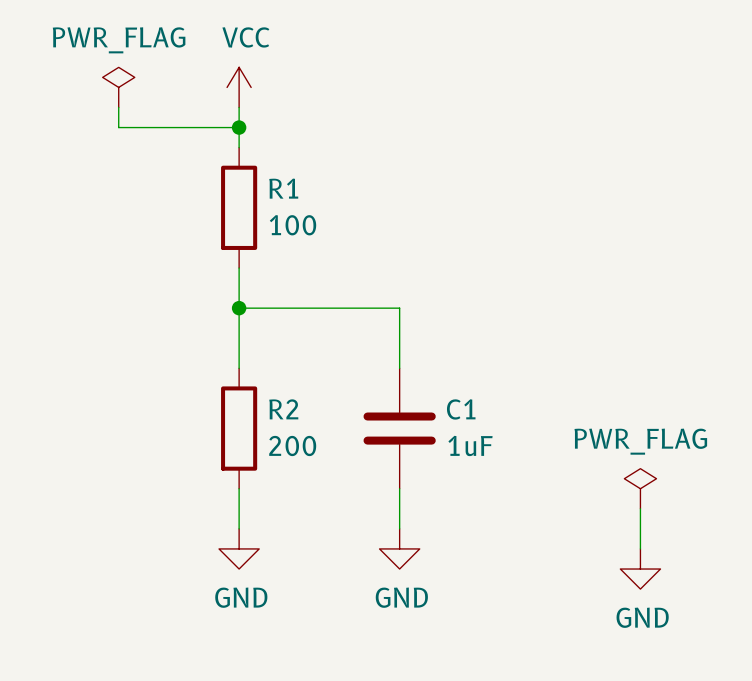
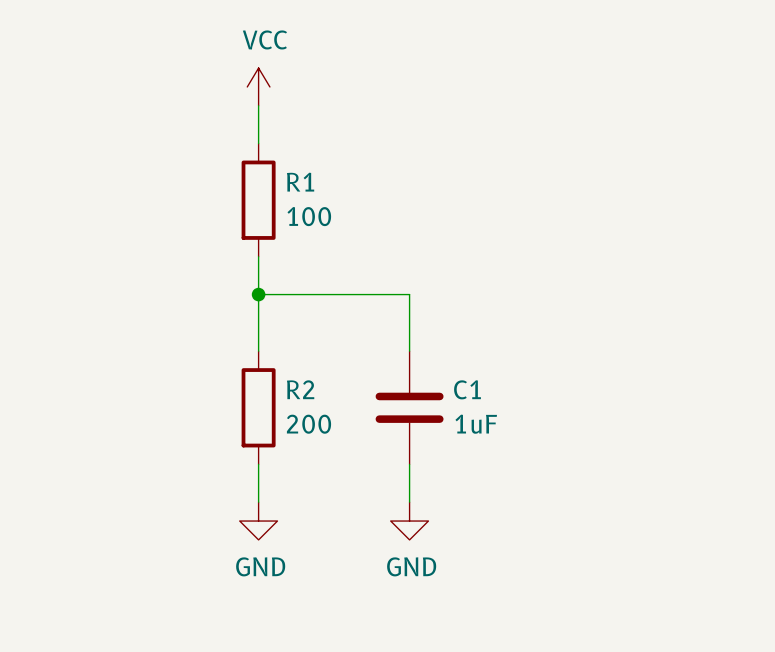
power symbol: PWR_FLAG (118, 87) -> none
wire: (118, 107) (118, 127) (239, 127) -> none
junction: (239, 127) -> none
power symbol: PWR_FLAG (640, 488) -> none
wire: (640, 508) (640, 548) -> none
power symbol: GND (640, 569) -> none

